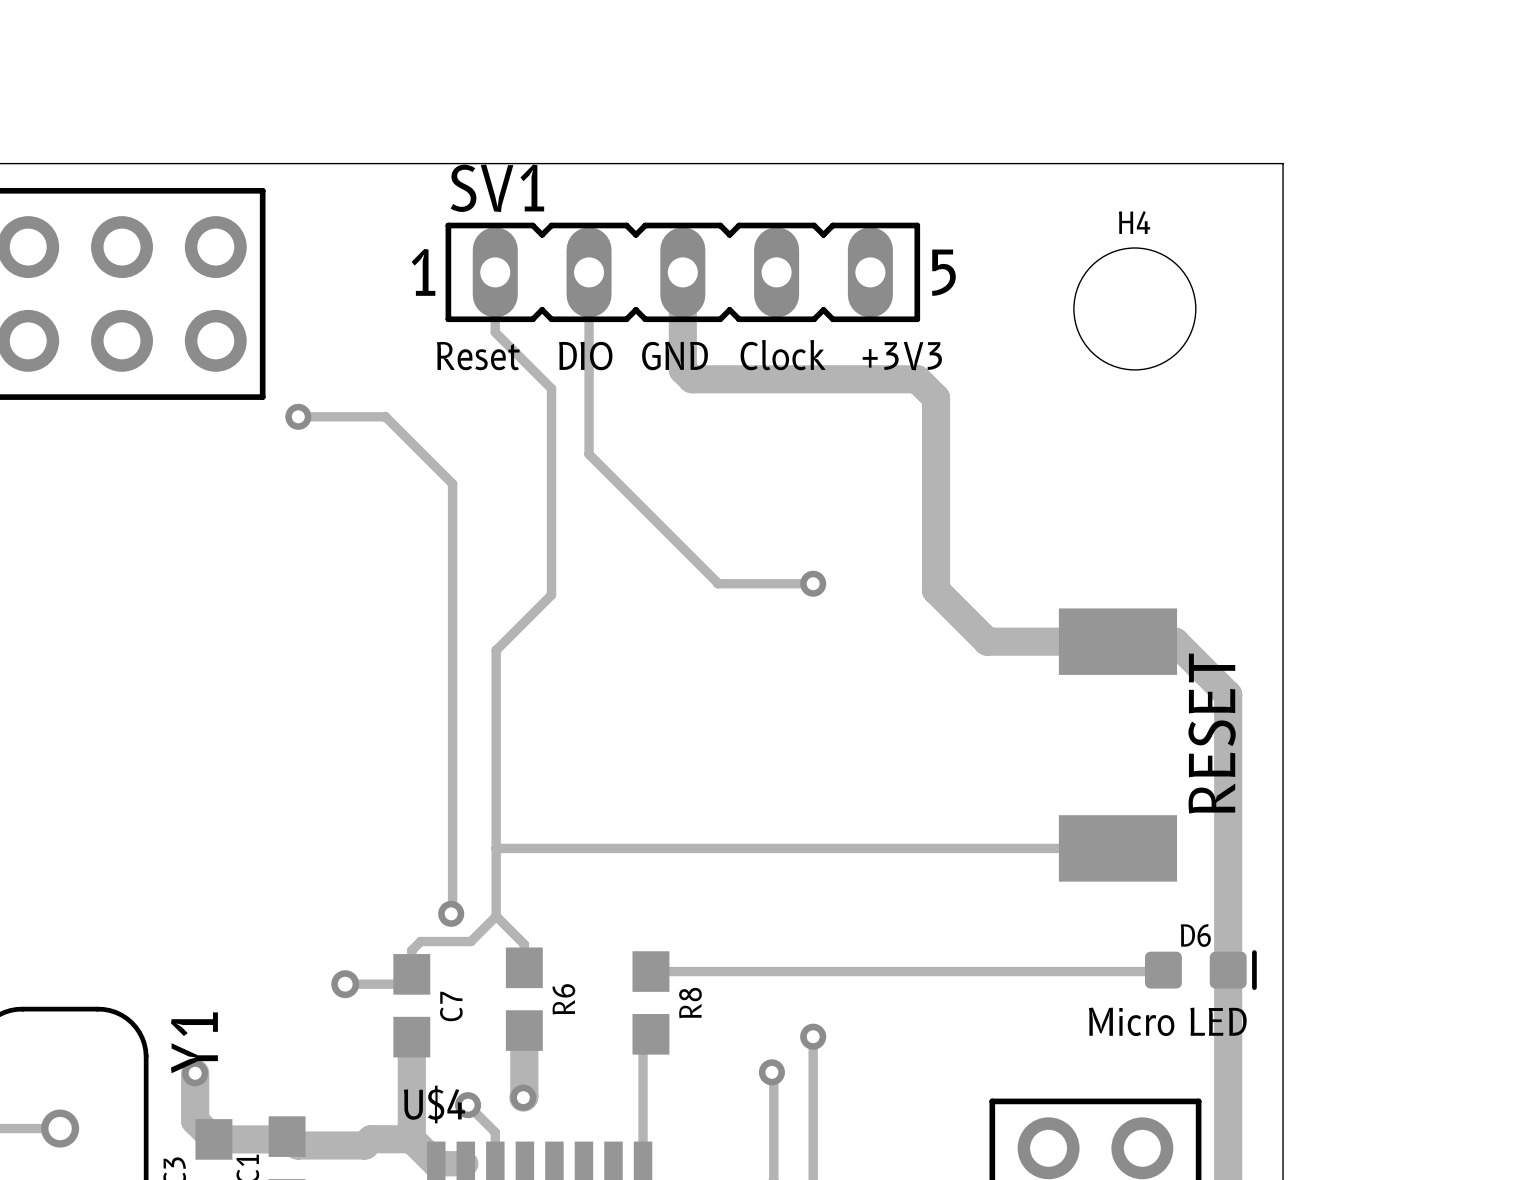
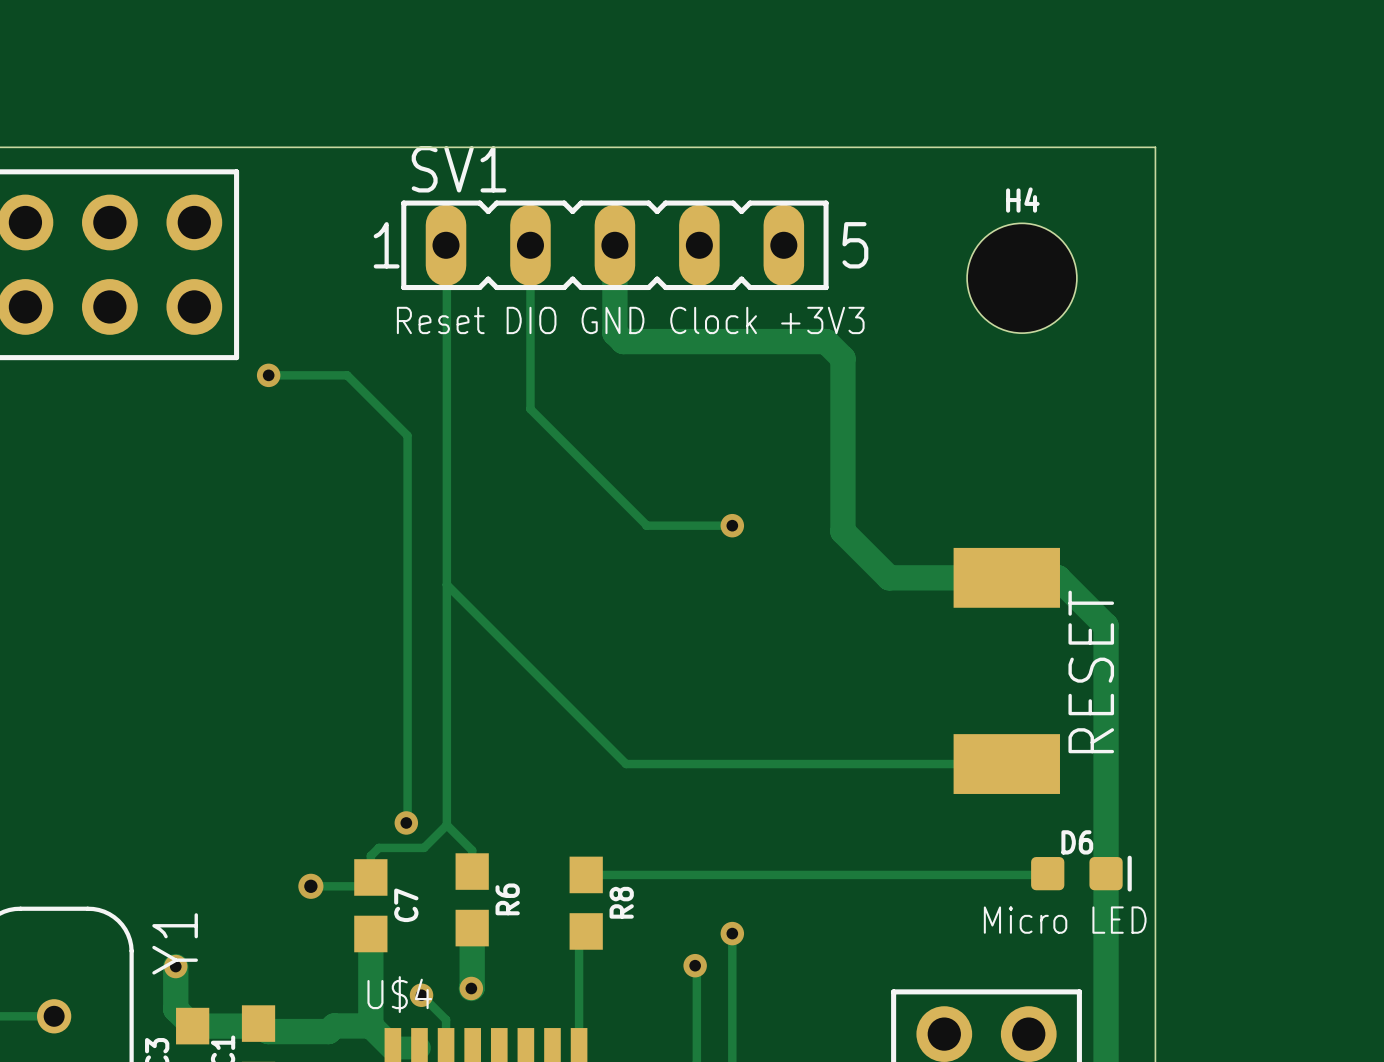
track: (496, 273) (495, 332) (551, 388) (551, 594) (496, 650) -> (446, 246) (446, 585)
track: (496, 848) (695, 848) -> (446, 584) (626, 764)

